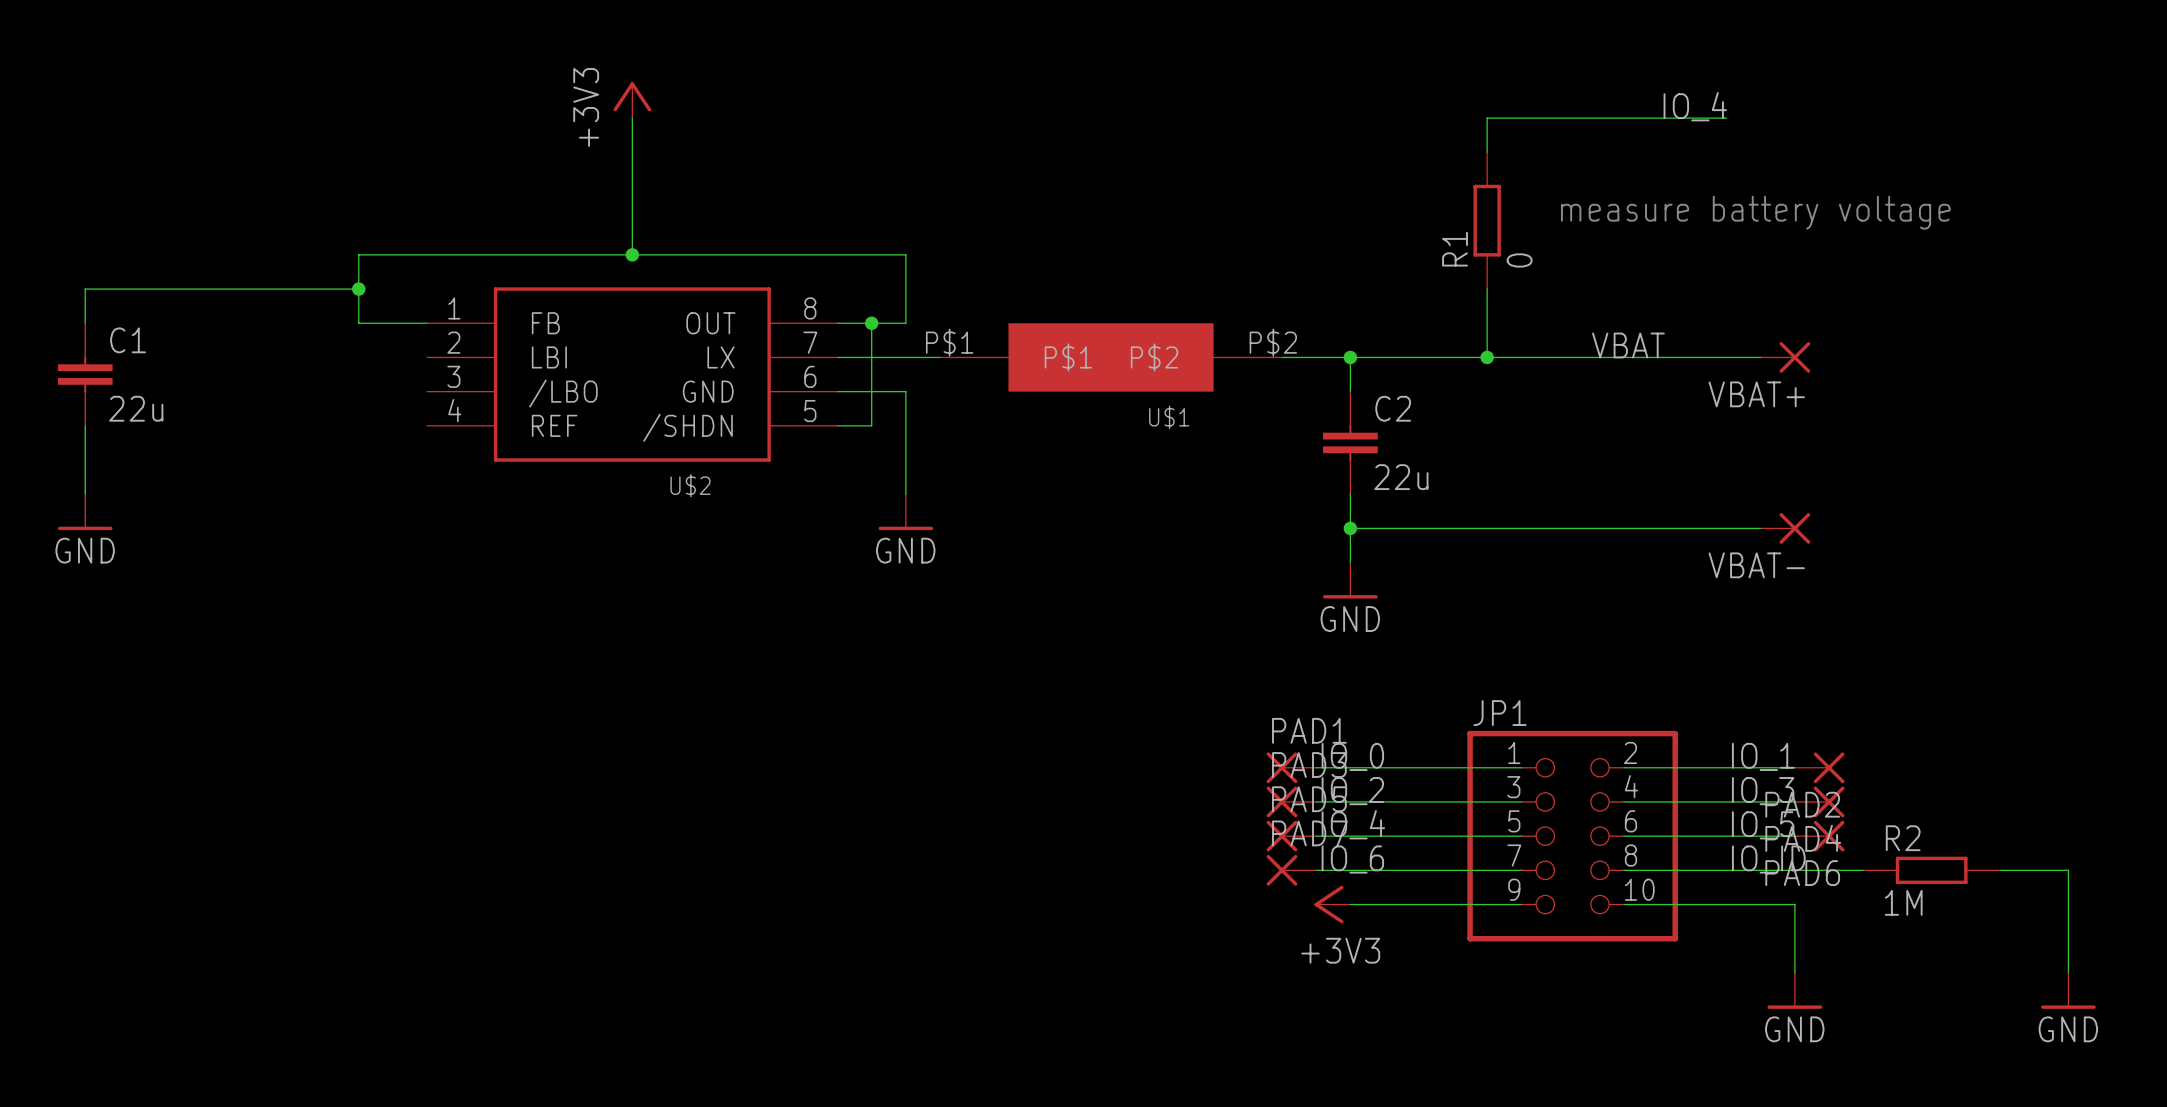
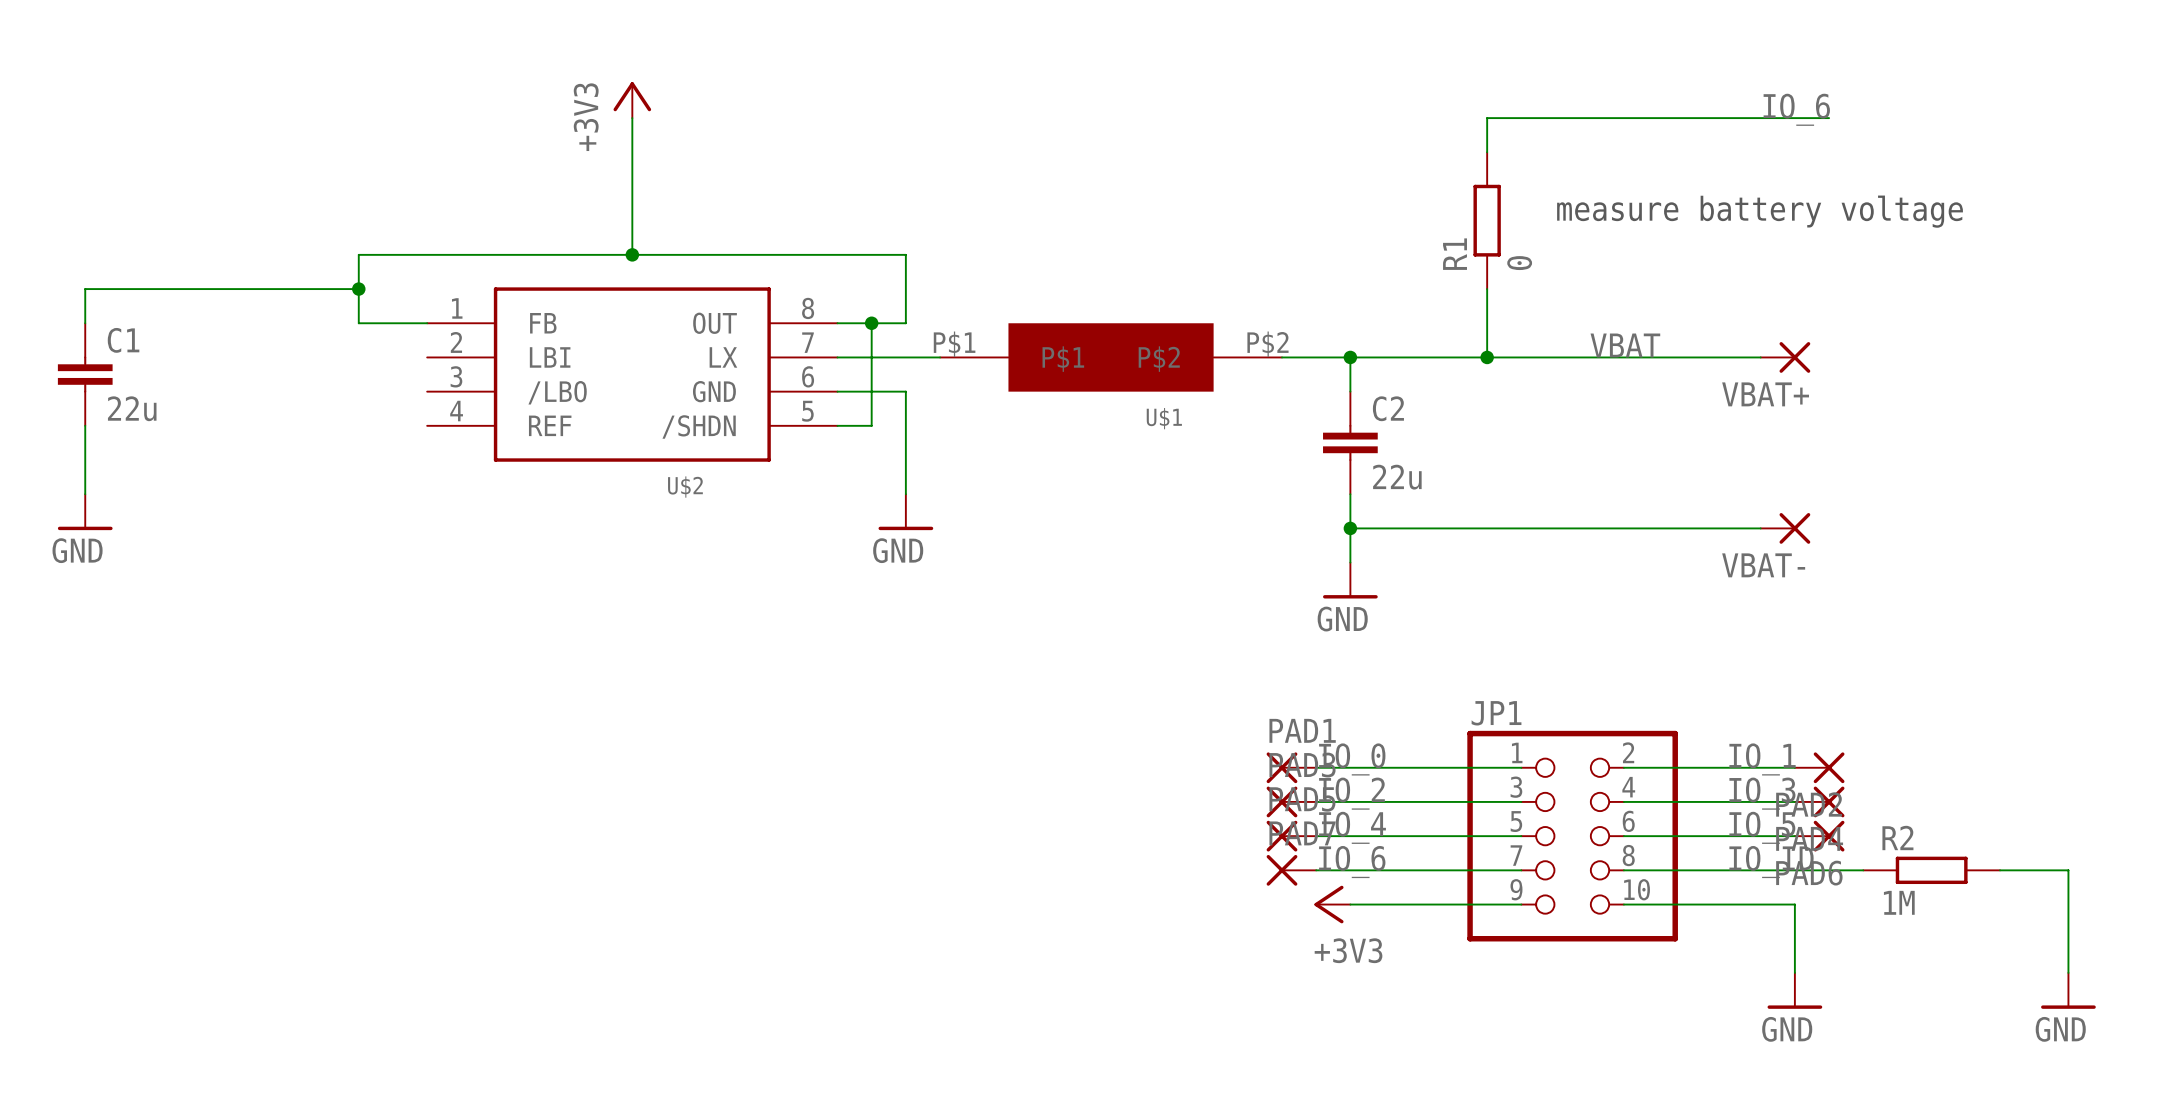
label: IO_4 (1695, 106) -> none
label: none -> IO_6 (1796, 109)
wire: none -> (1726, 118) (1829, 118)

